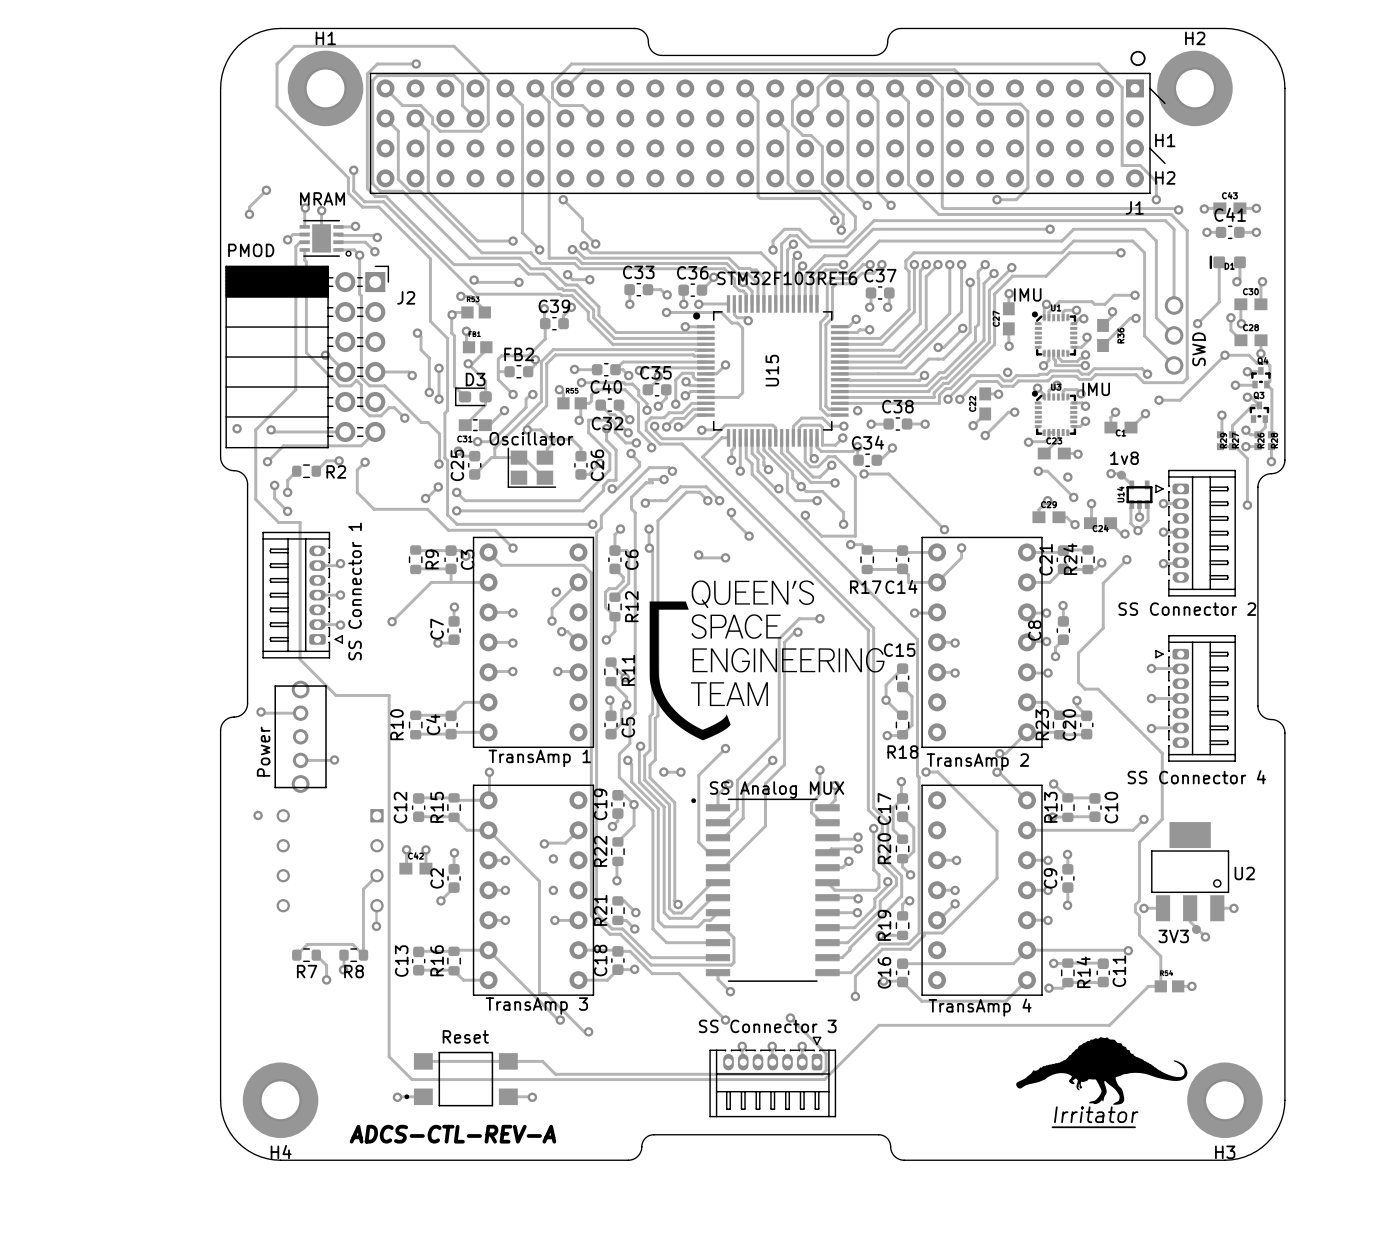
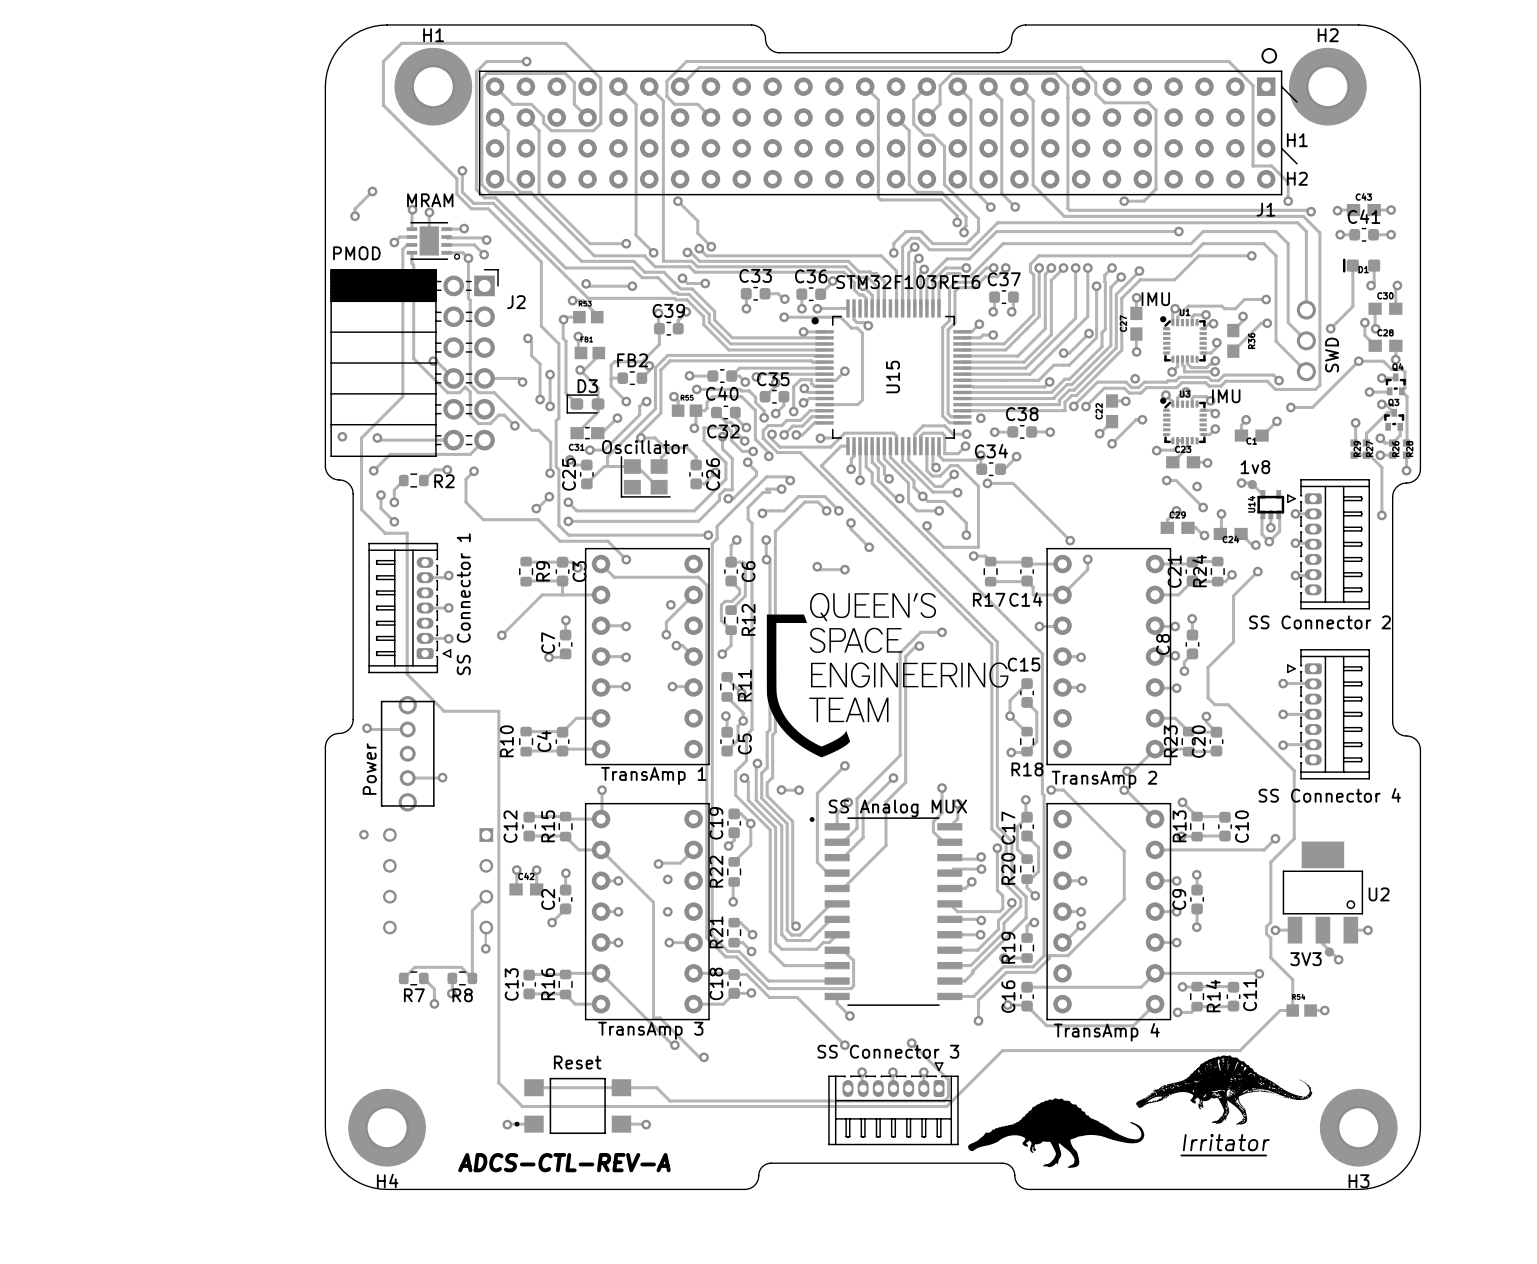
part footprint: [1016, 1037, 1188, 1105] -> [1136, 1055, 1313, 1125]
part: none -> (1056, 1133)

